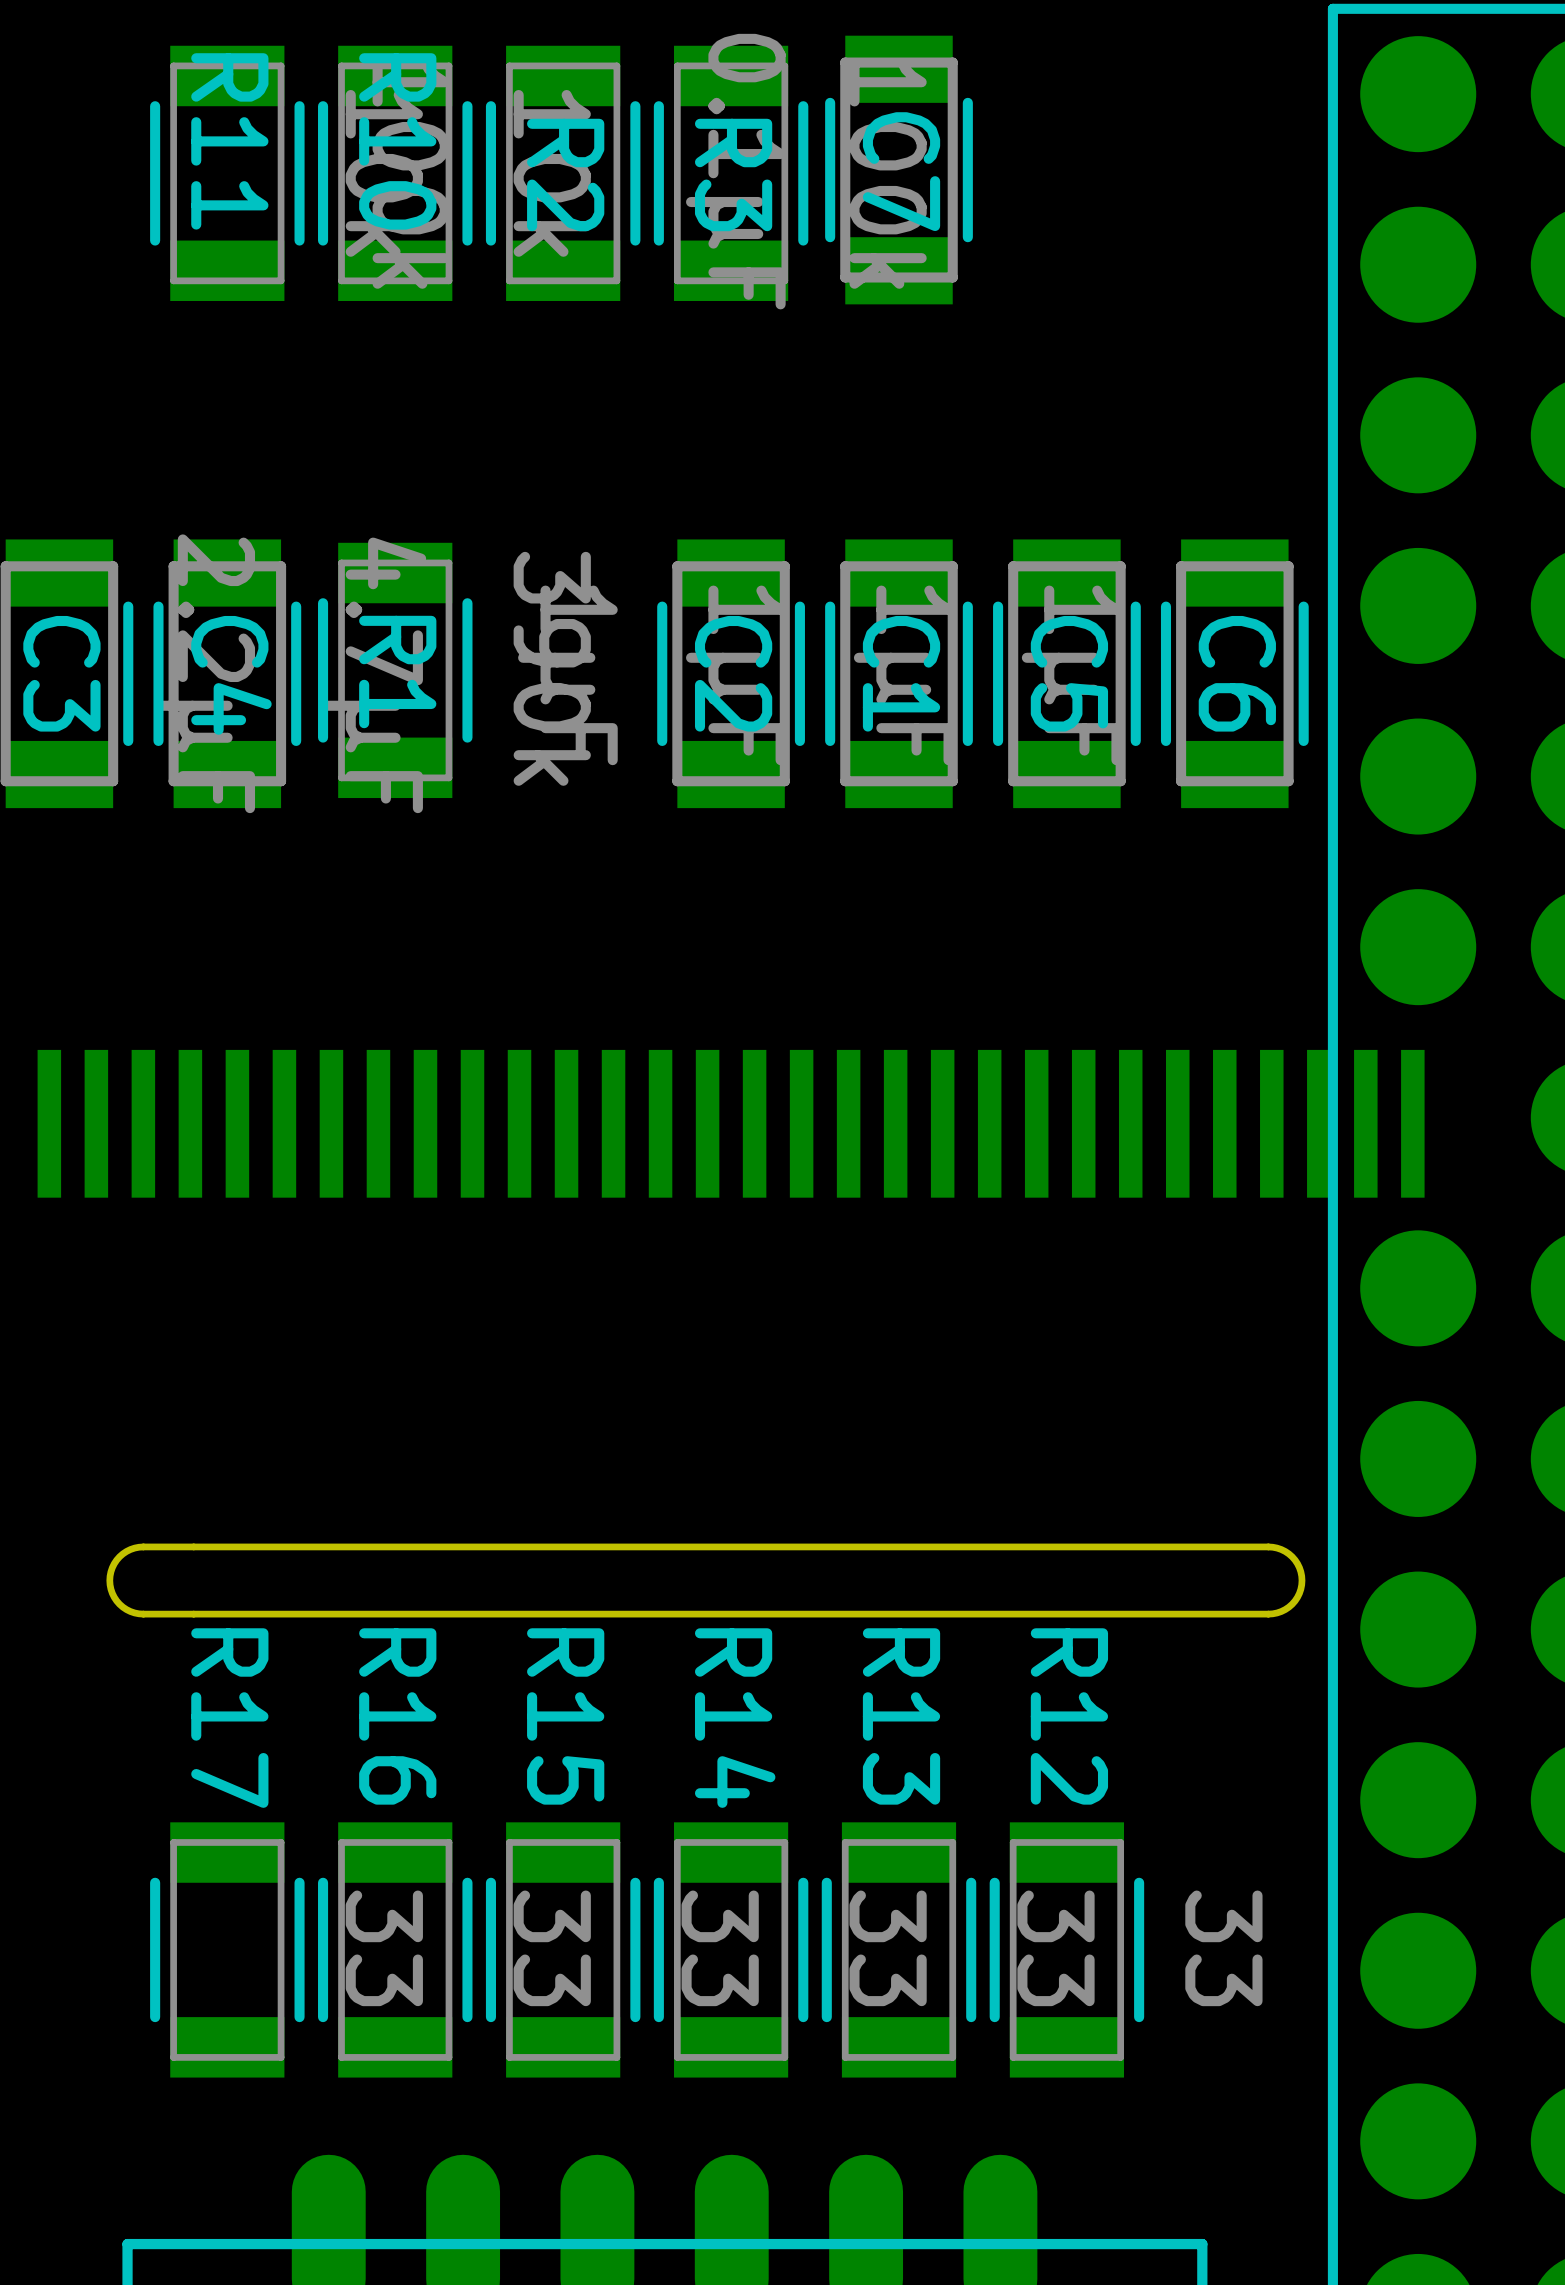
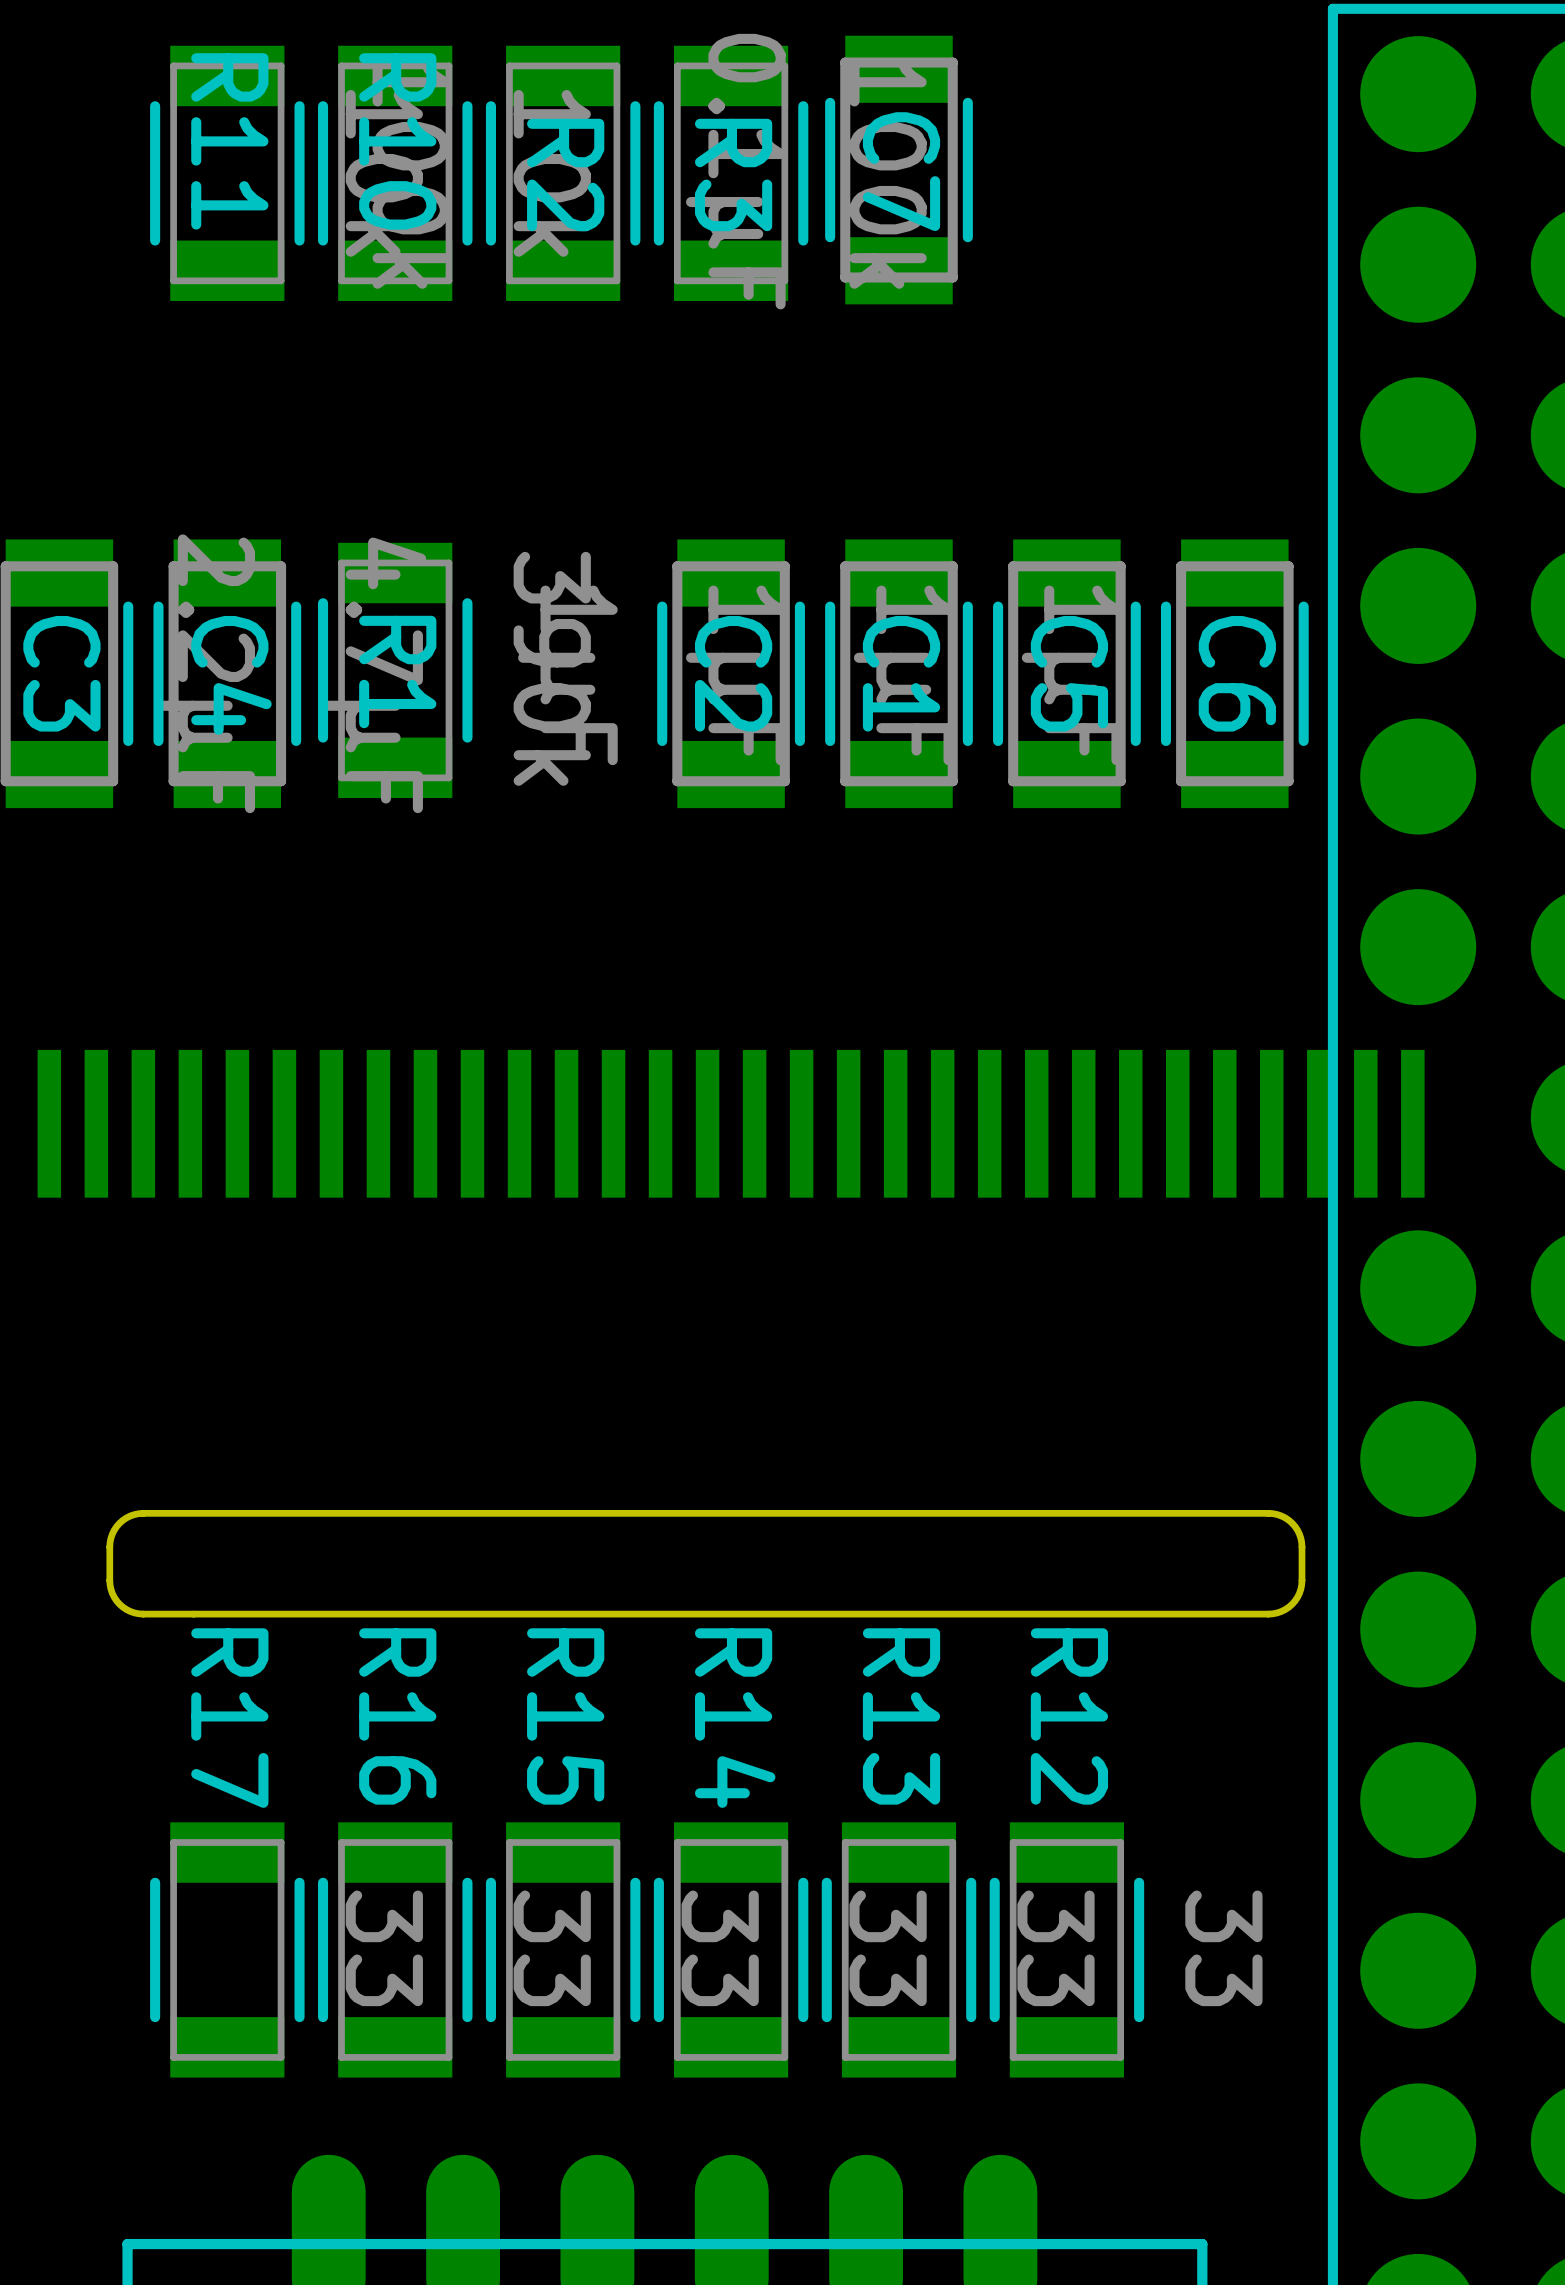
board edge: (1268, 1614) (1281, 1611) (1292, 1604) (1299, 1593) (1302, 1580) (1299, 1567) (1292, 1556) (1281, 1549) (1268, 1546) (143, 1546) (130, 1549) (119, 1556) (112, 1567) (109, 1580) (112, 1593) (119, 1604) (130, 1611) (143, 1614) -> (1268, 1614) (1281, 1611) (1292, 1604) (1299, 1593) (1302, 1580) (1301, 1542) (1297, 1530) (1285, 1517) (1268, 1513) (138, 1513) (122, 1520) (112, 1534) (109, 1546) (109, 1580) (112, 1593) (119, 1604) (130, 1611) (143, 1614)

